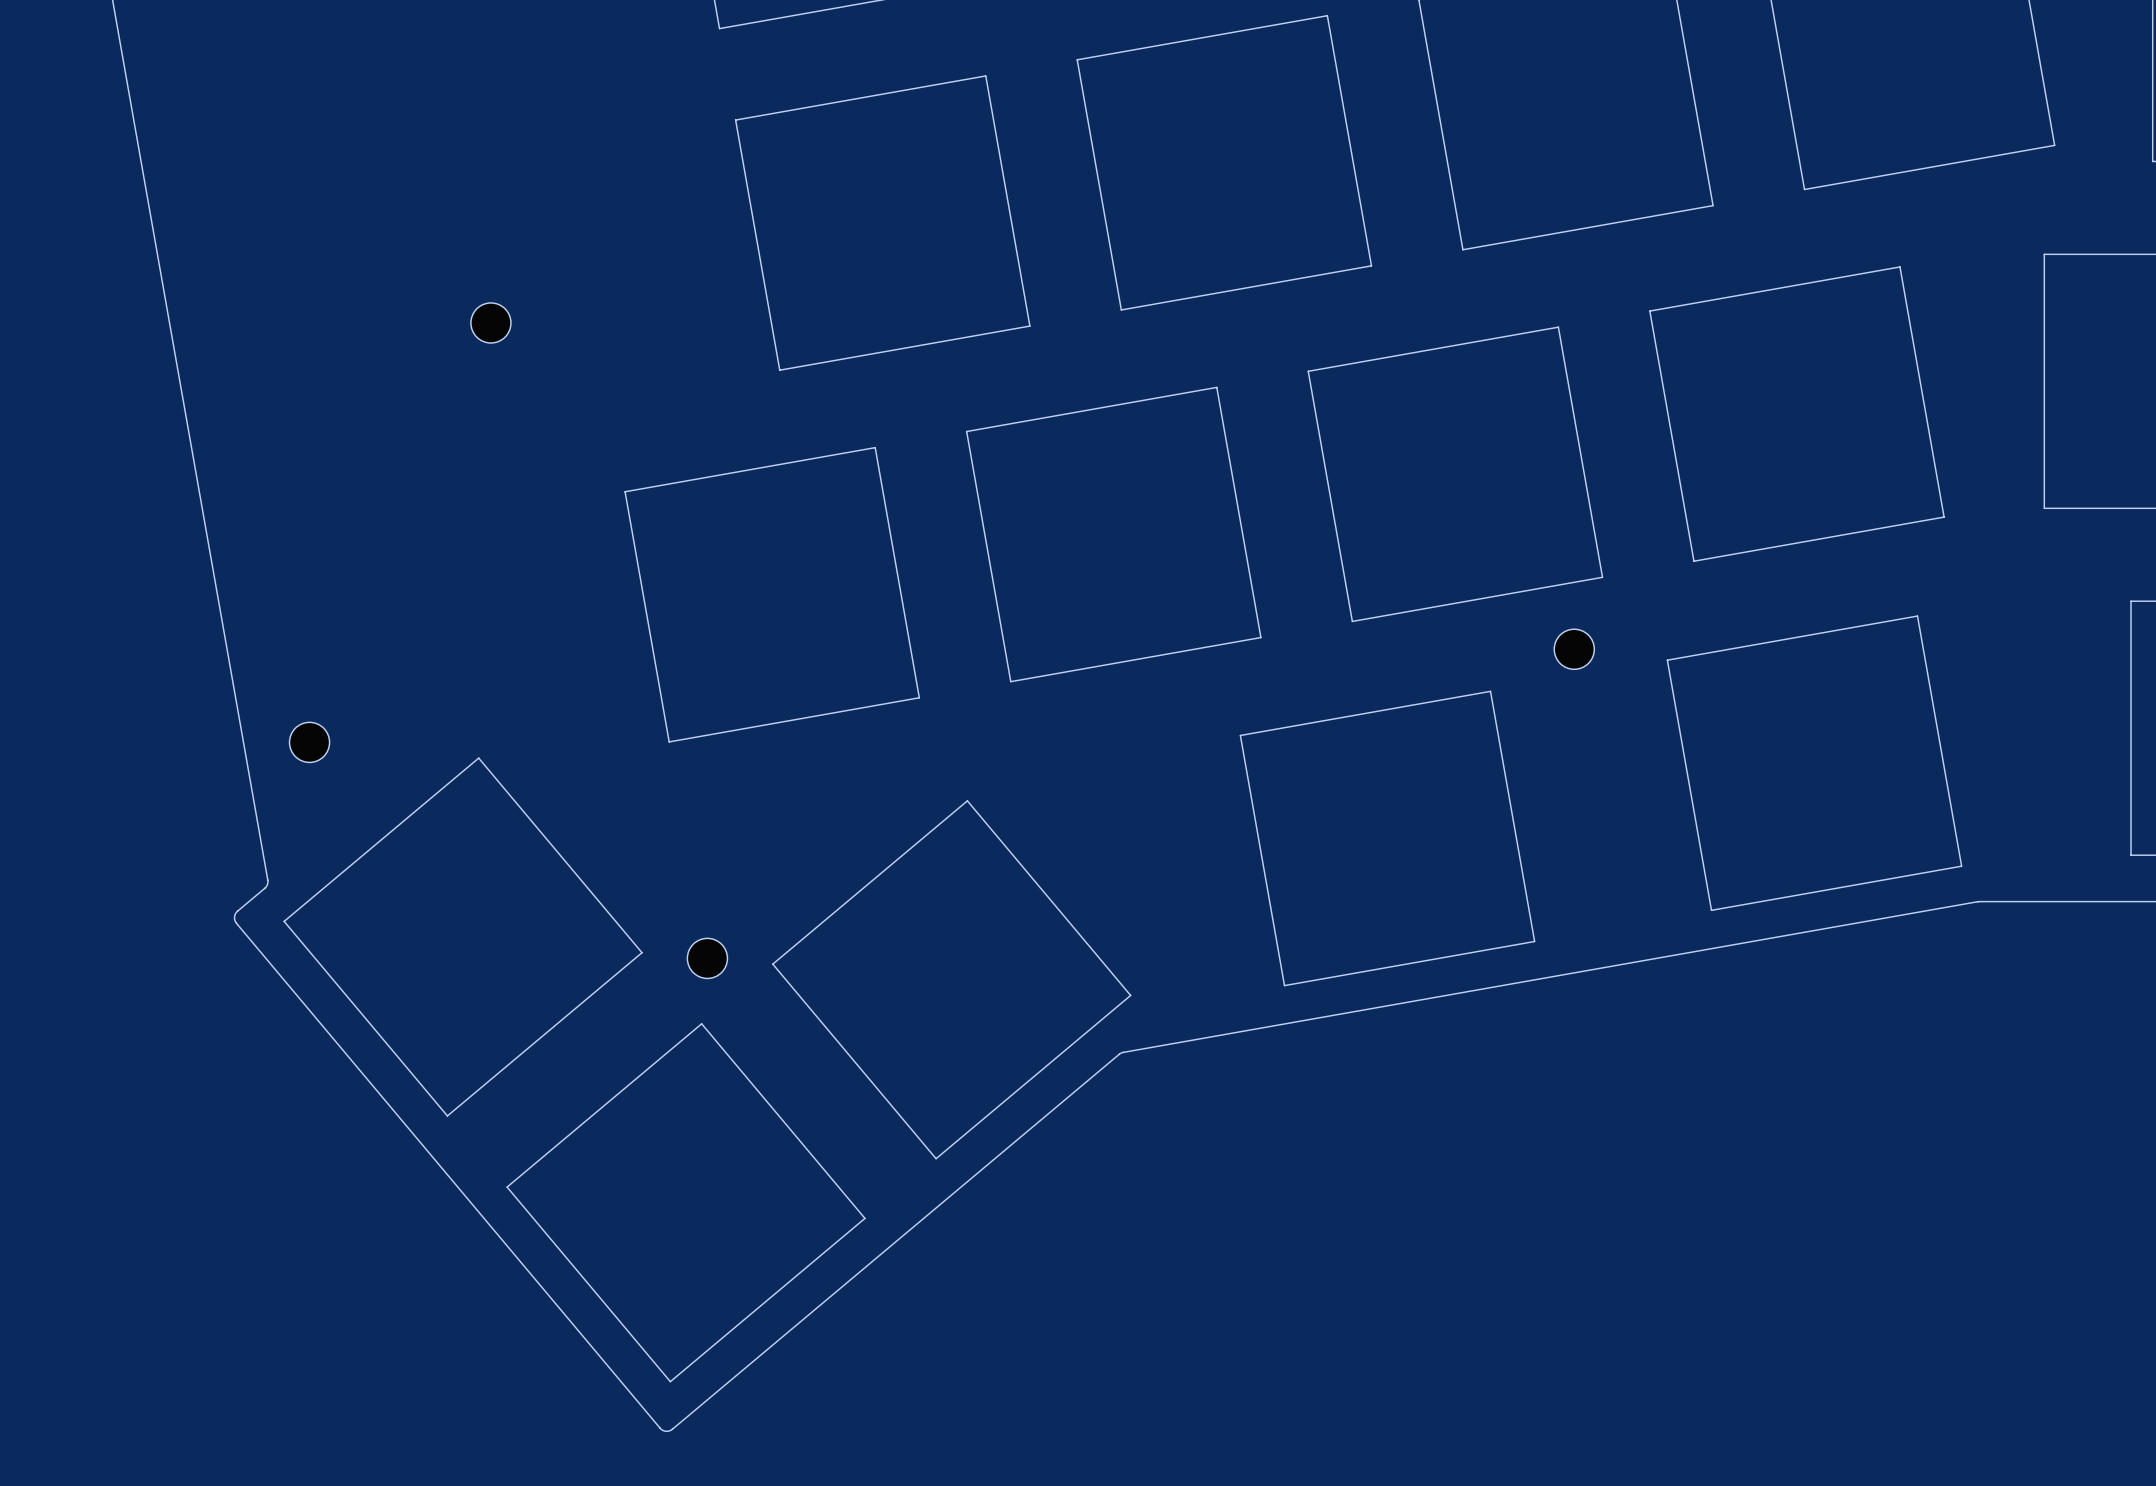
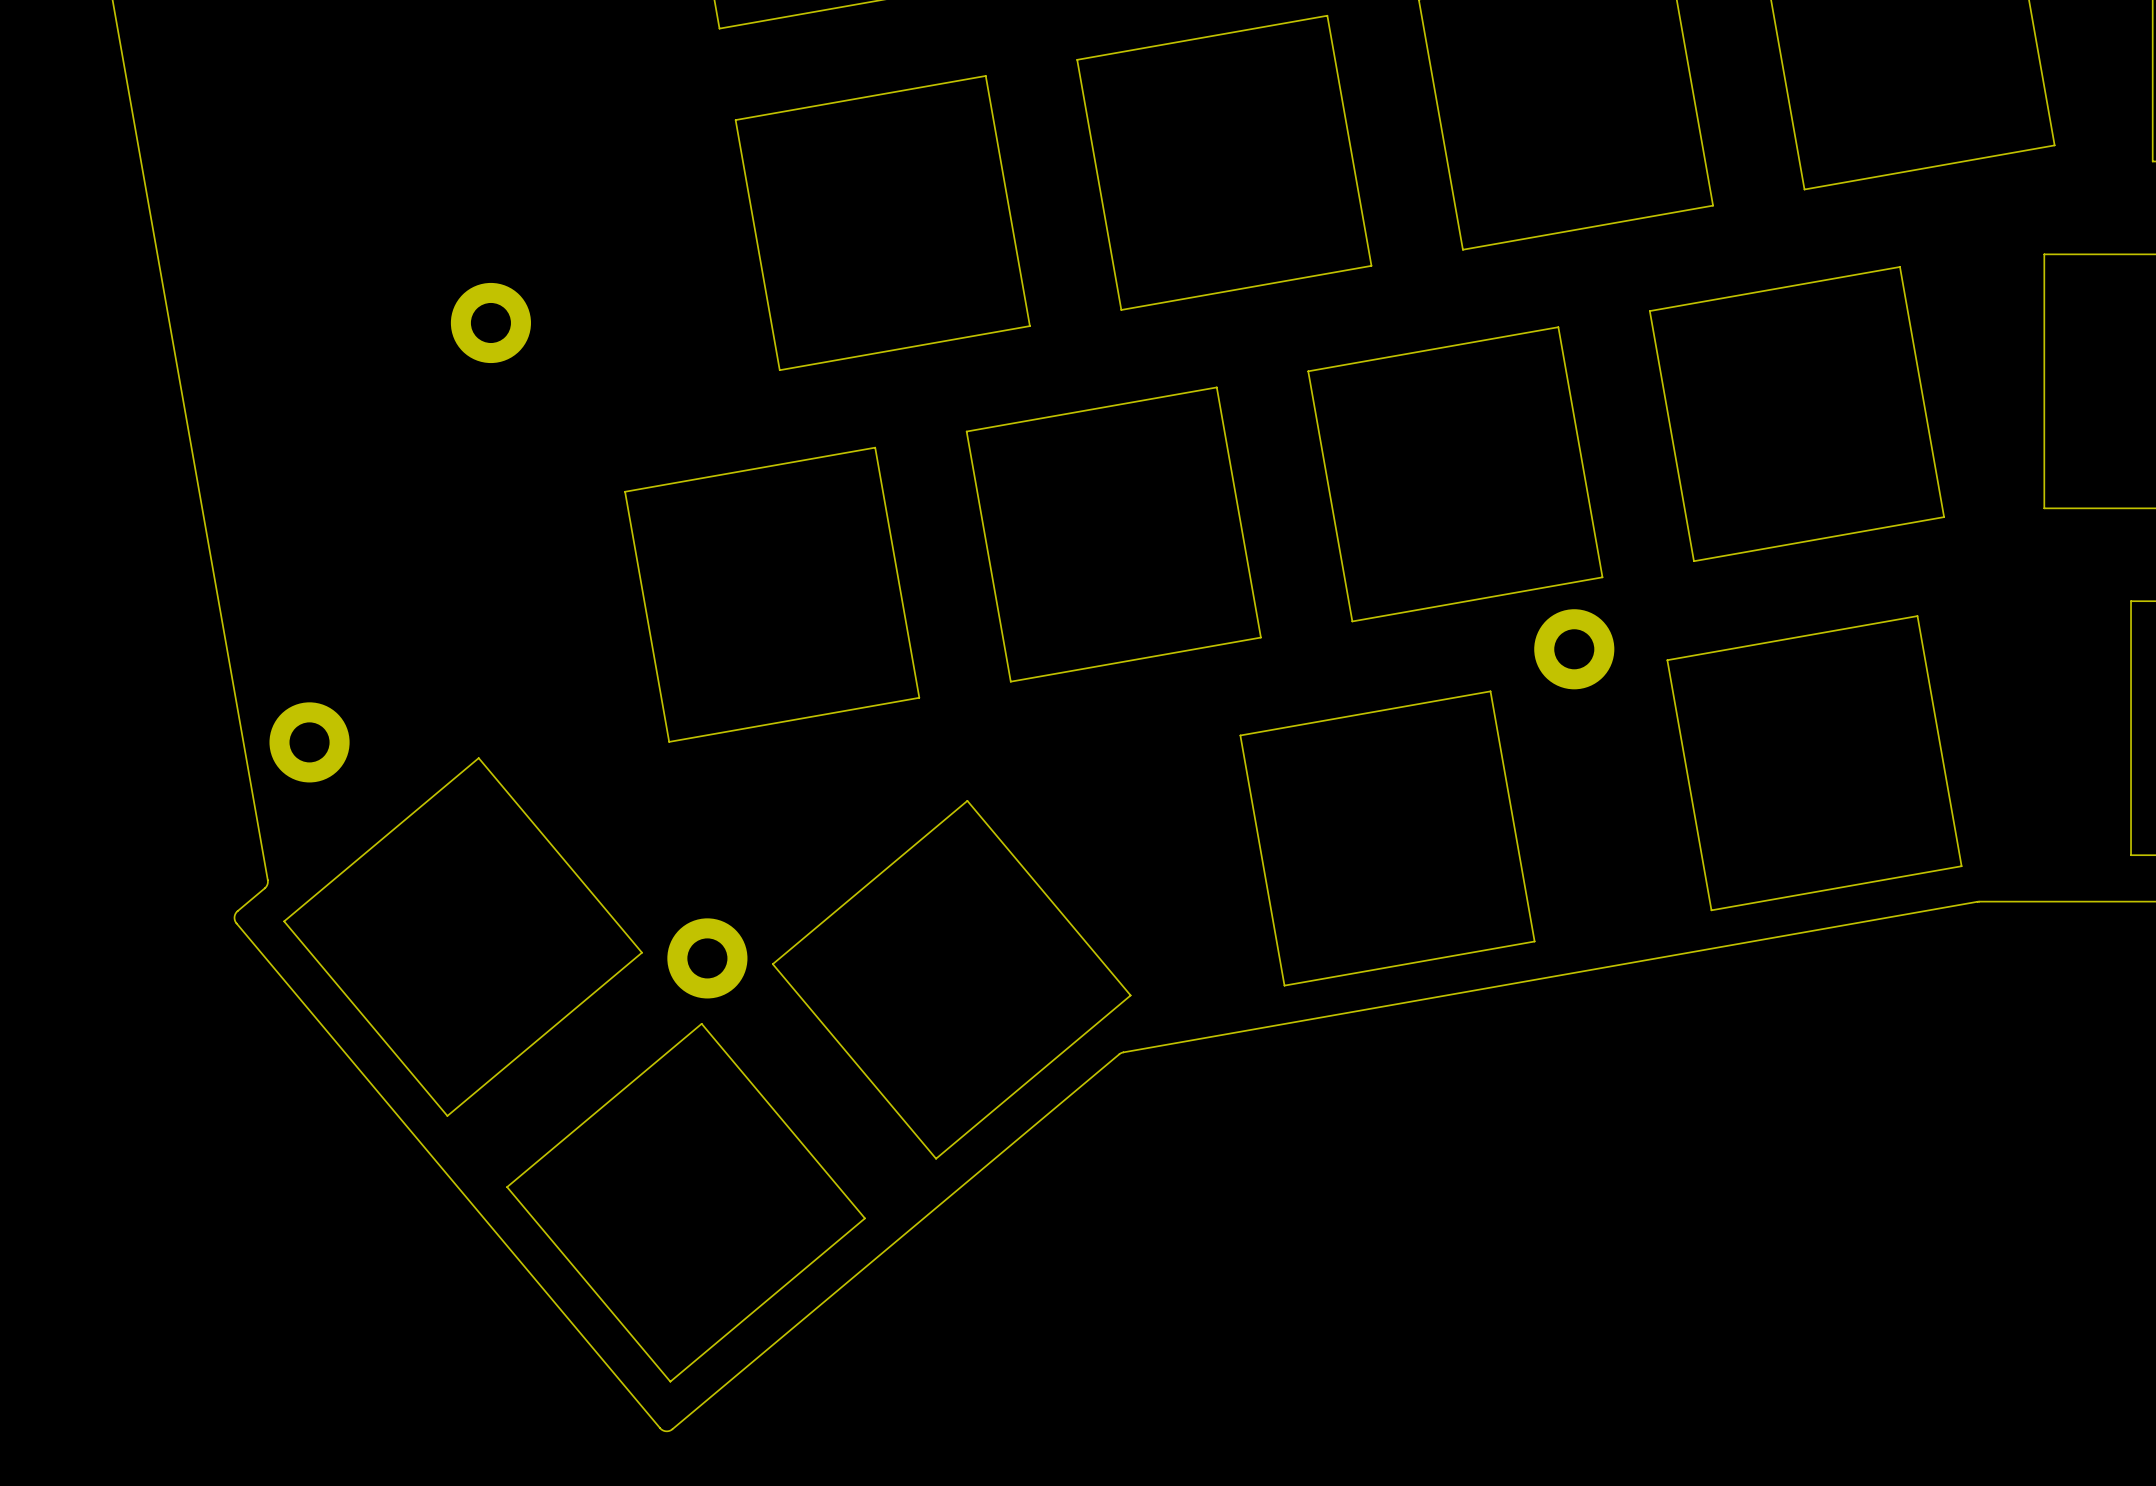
part footprint: [470, 302, 511, 344] -> [450, 282, 532, 364]
part footprint: [1554, 629, 1595, 670] -> [1534, 609, 1615, 690]
part footprint: [289, 722, 330, 763] -> [269, 702, 350, 783]
part footprint: [687, 938, 728, 979] -> [667, 918, 748, 999]

